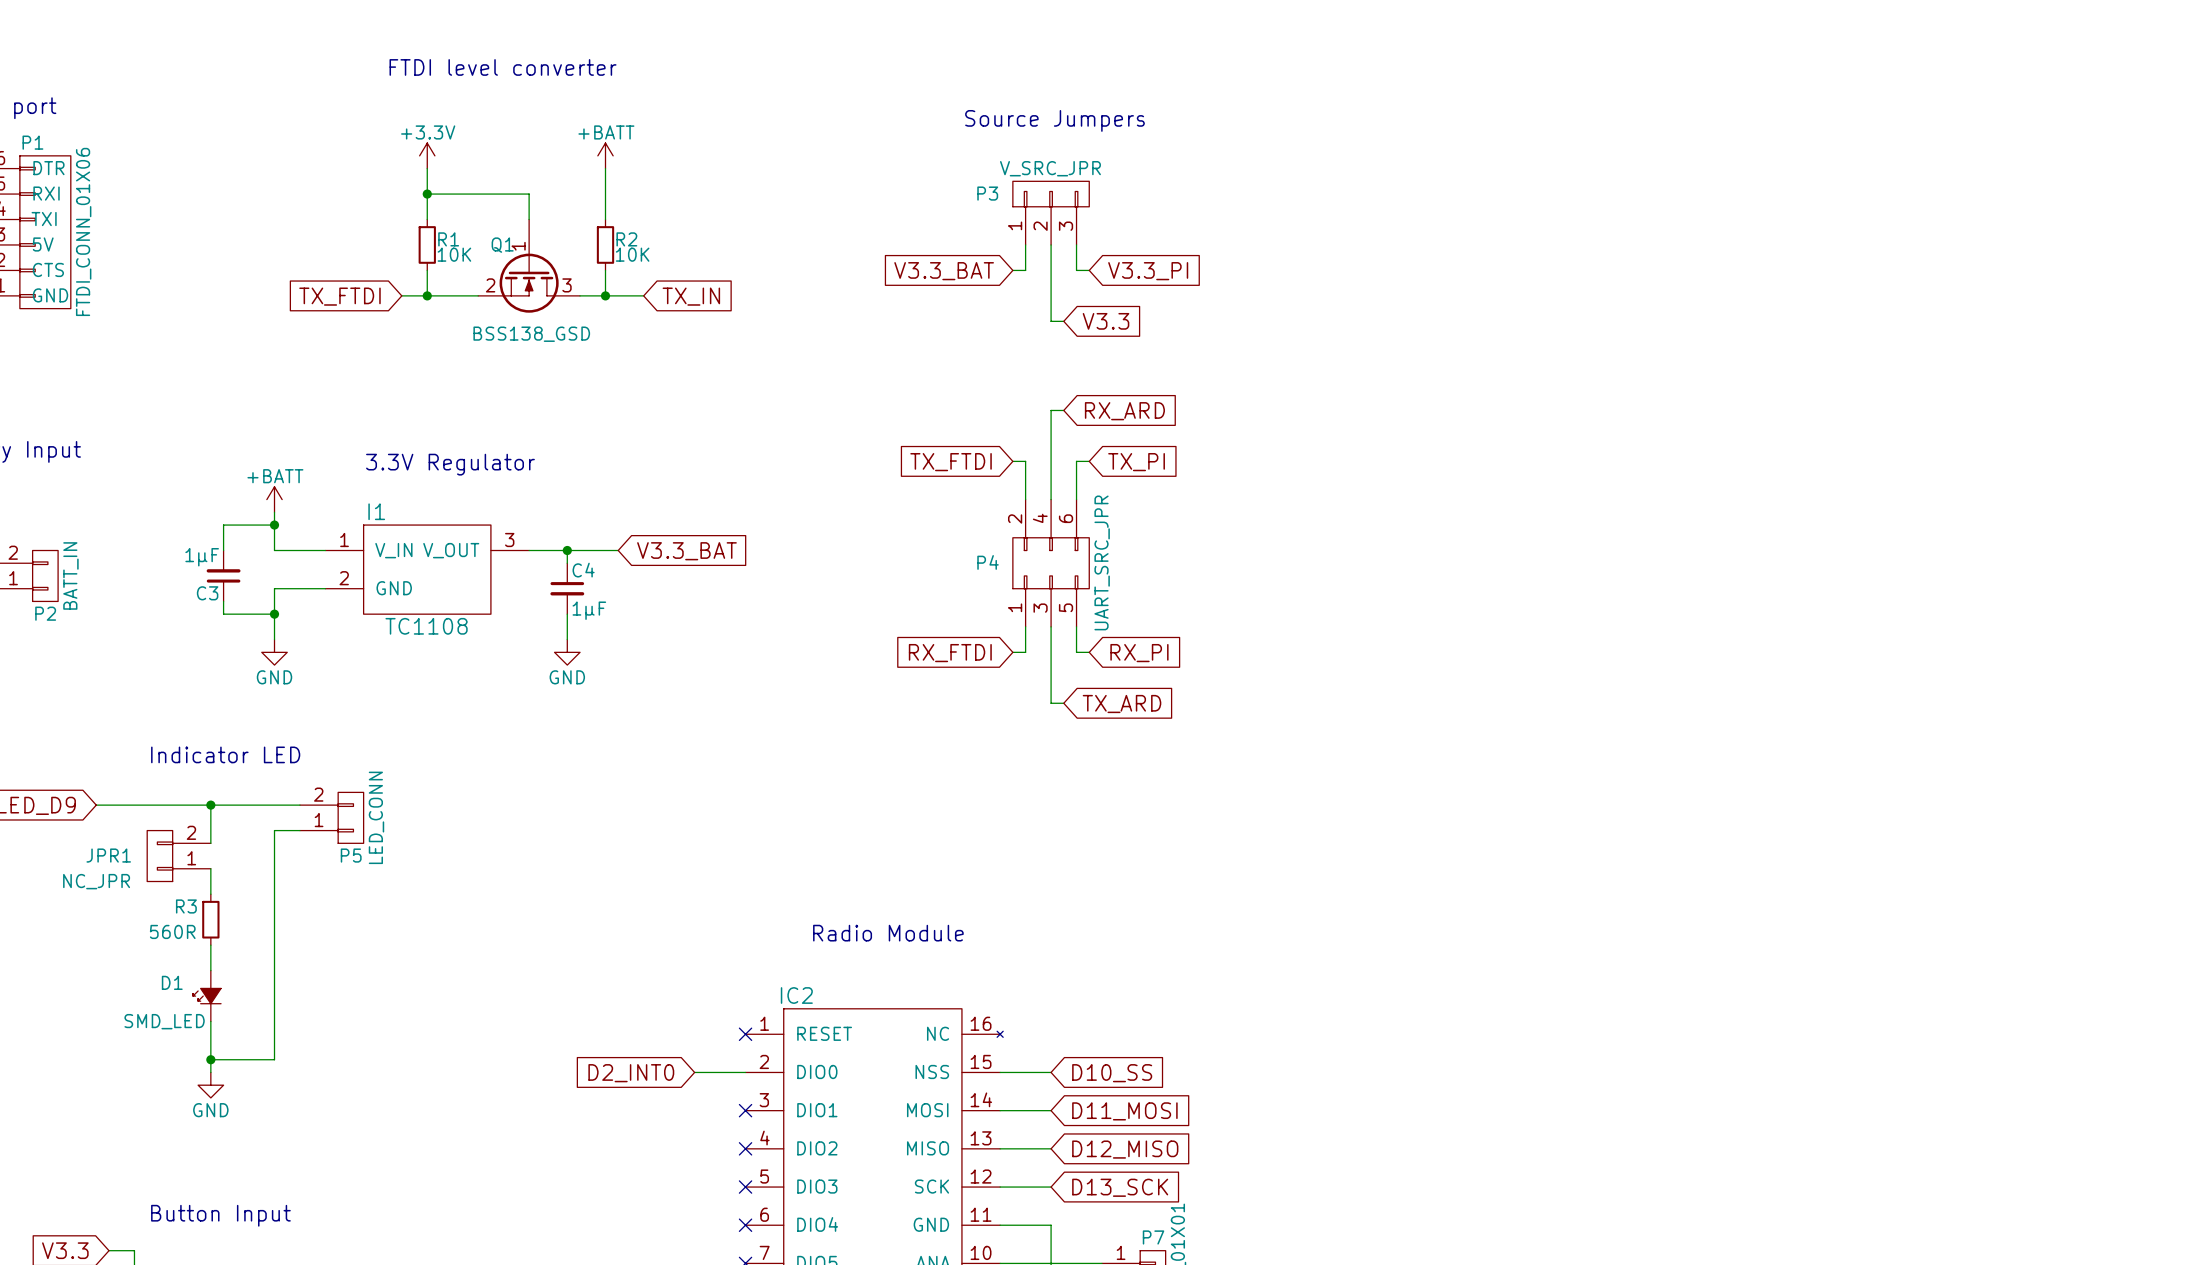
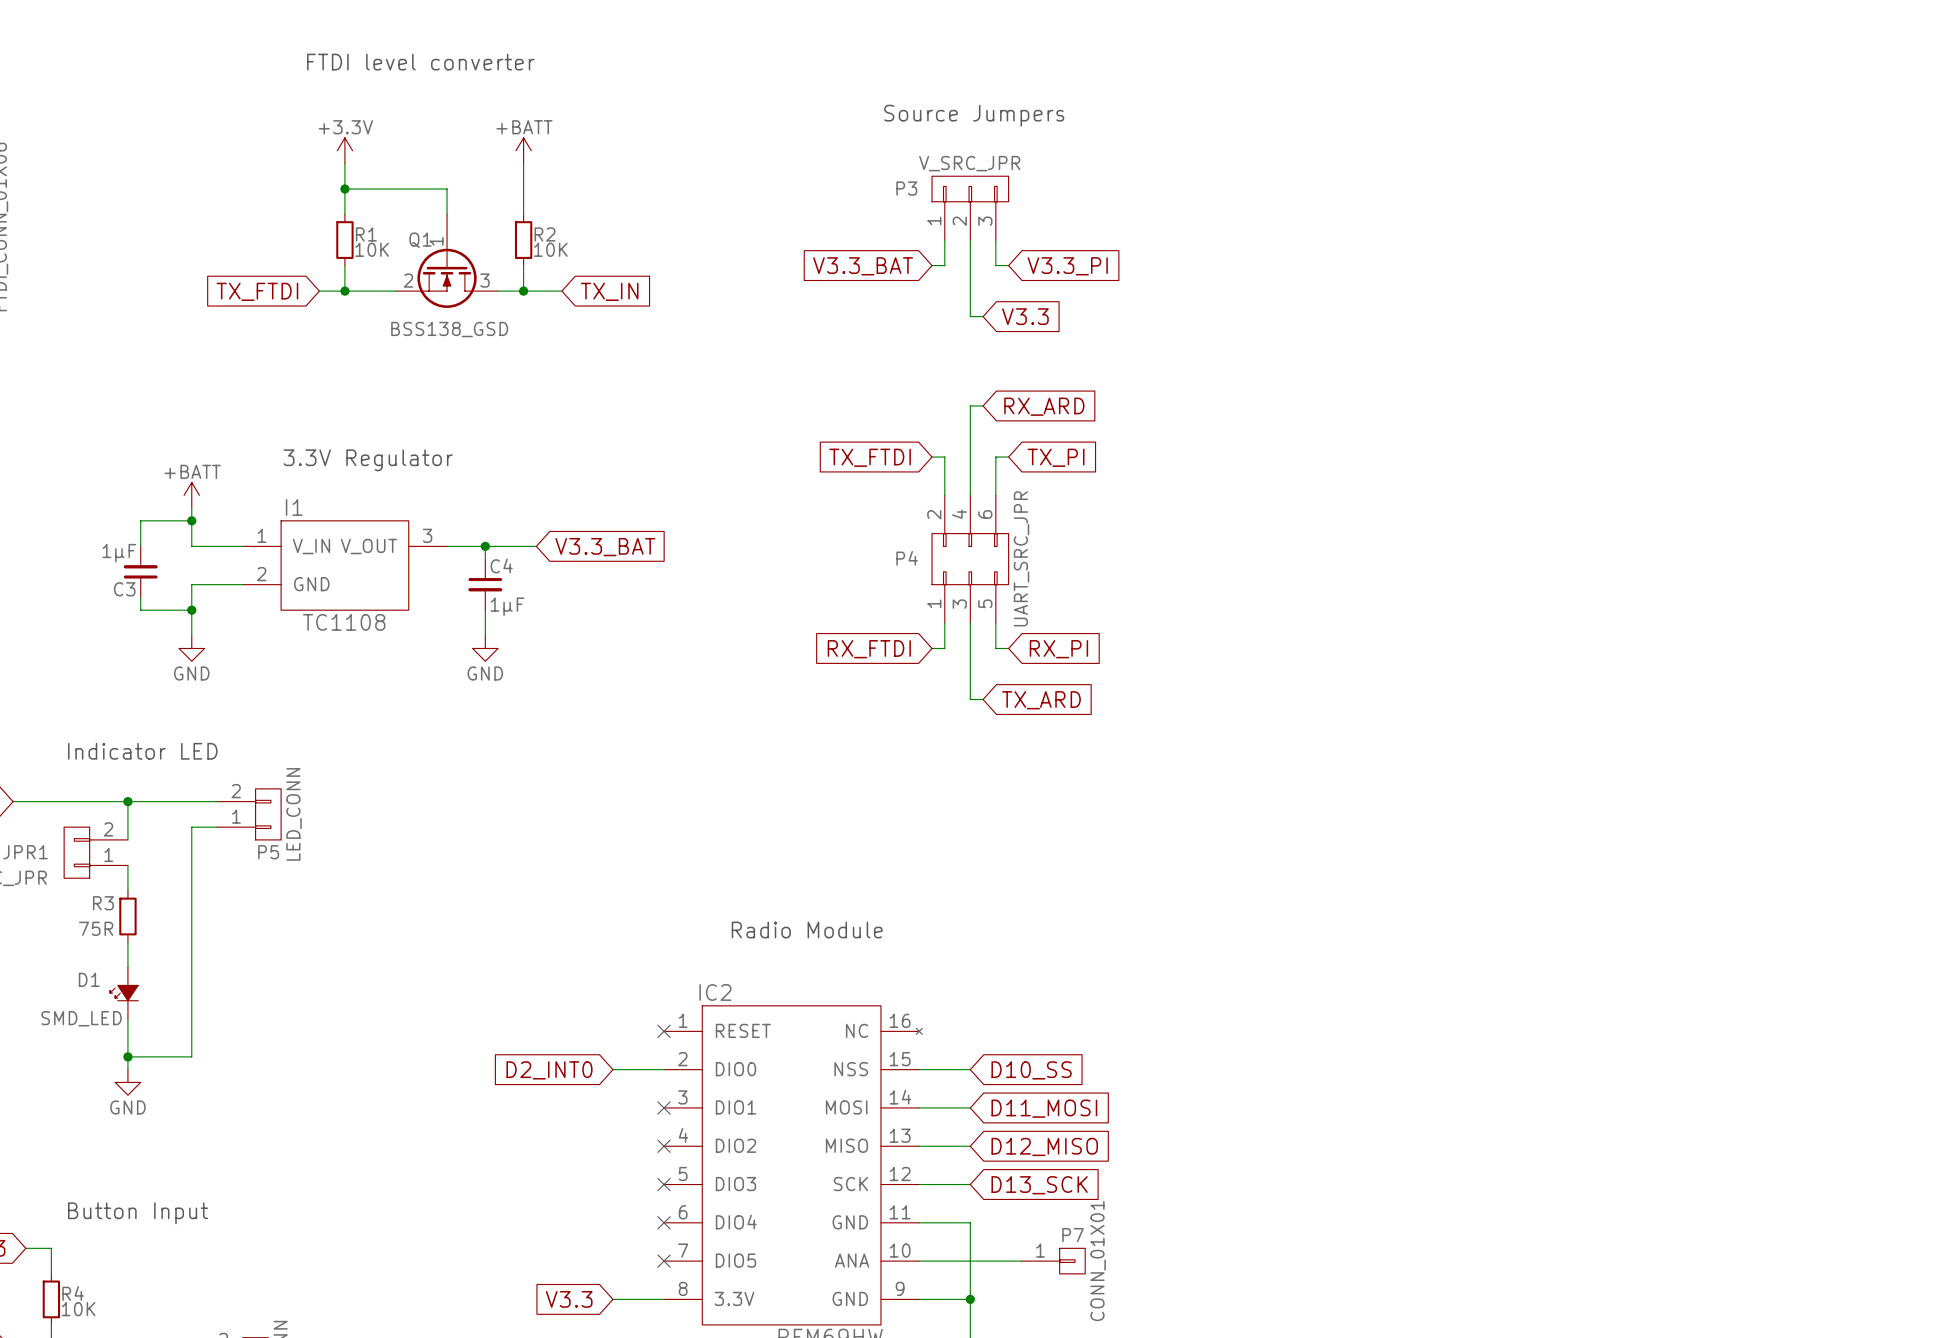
R3 value: 560R (172, 931) -> 75R (96, 928)

